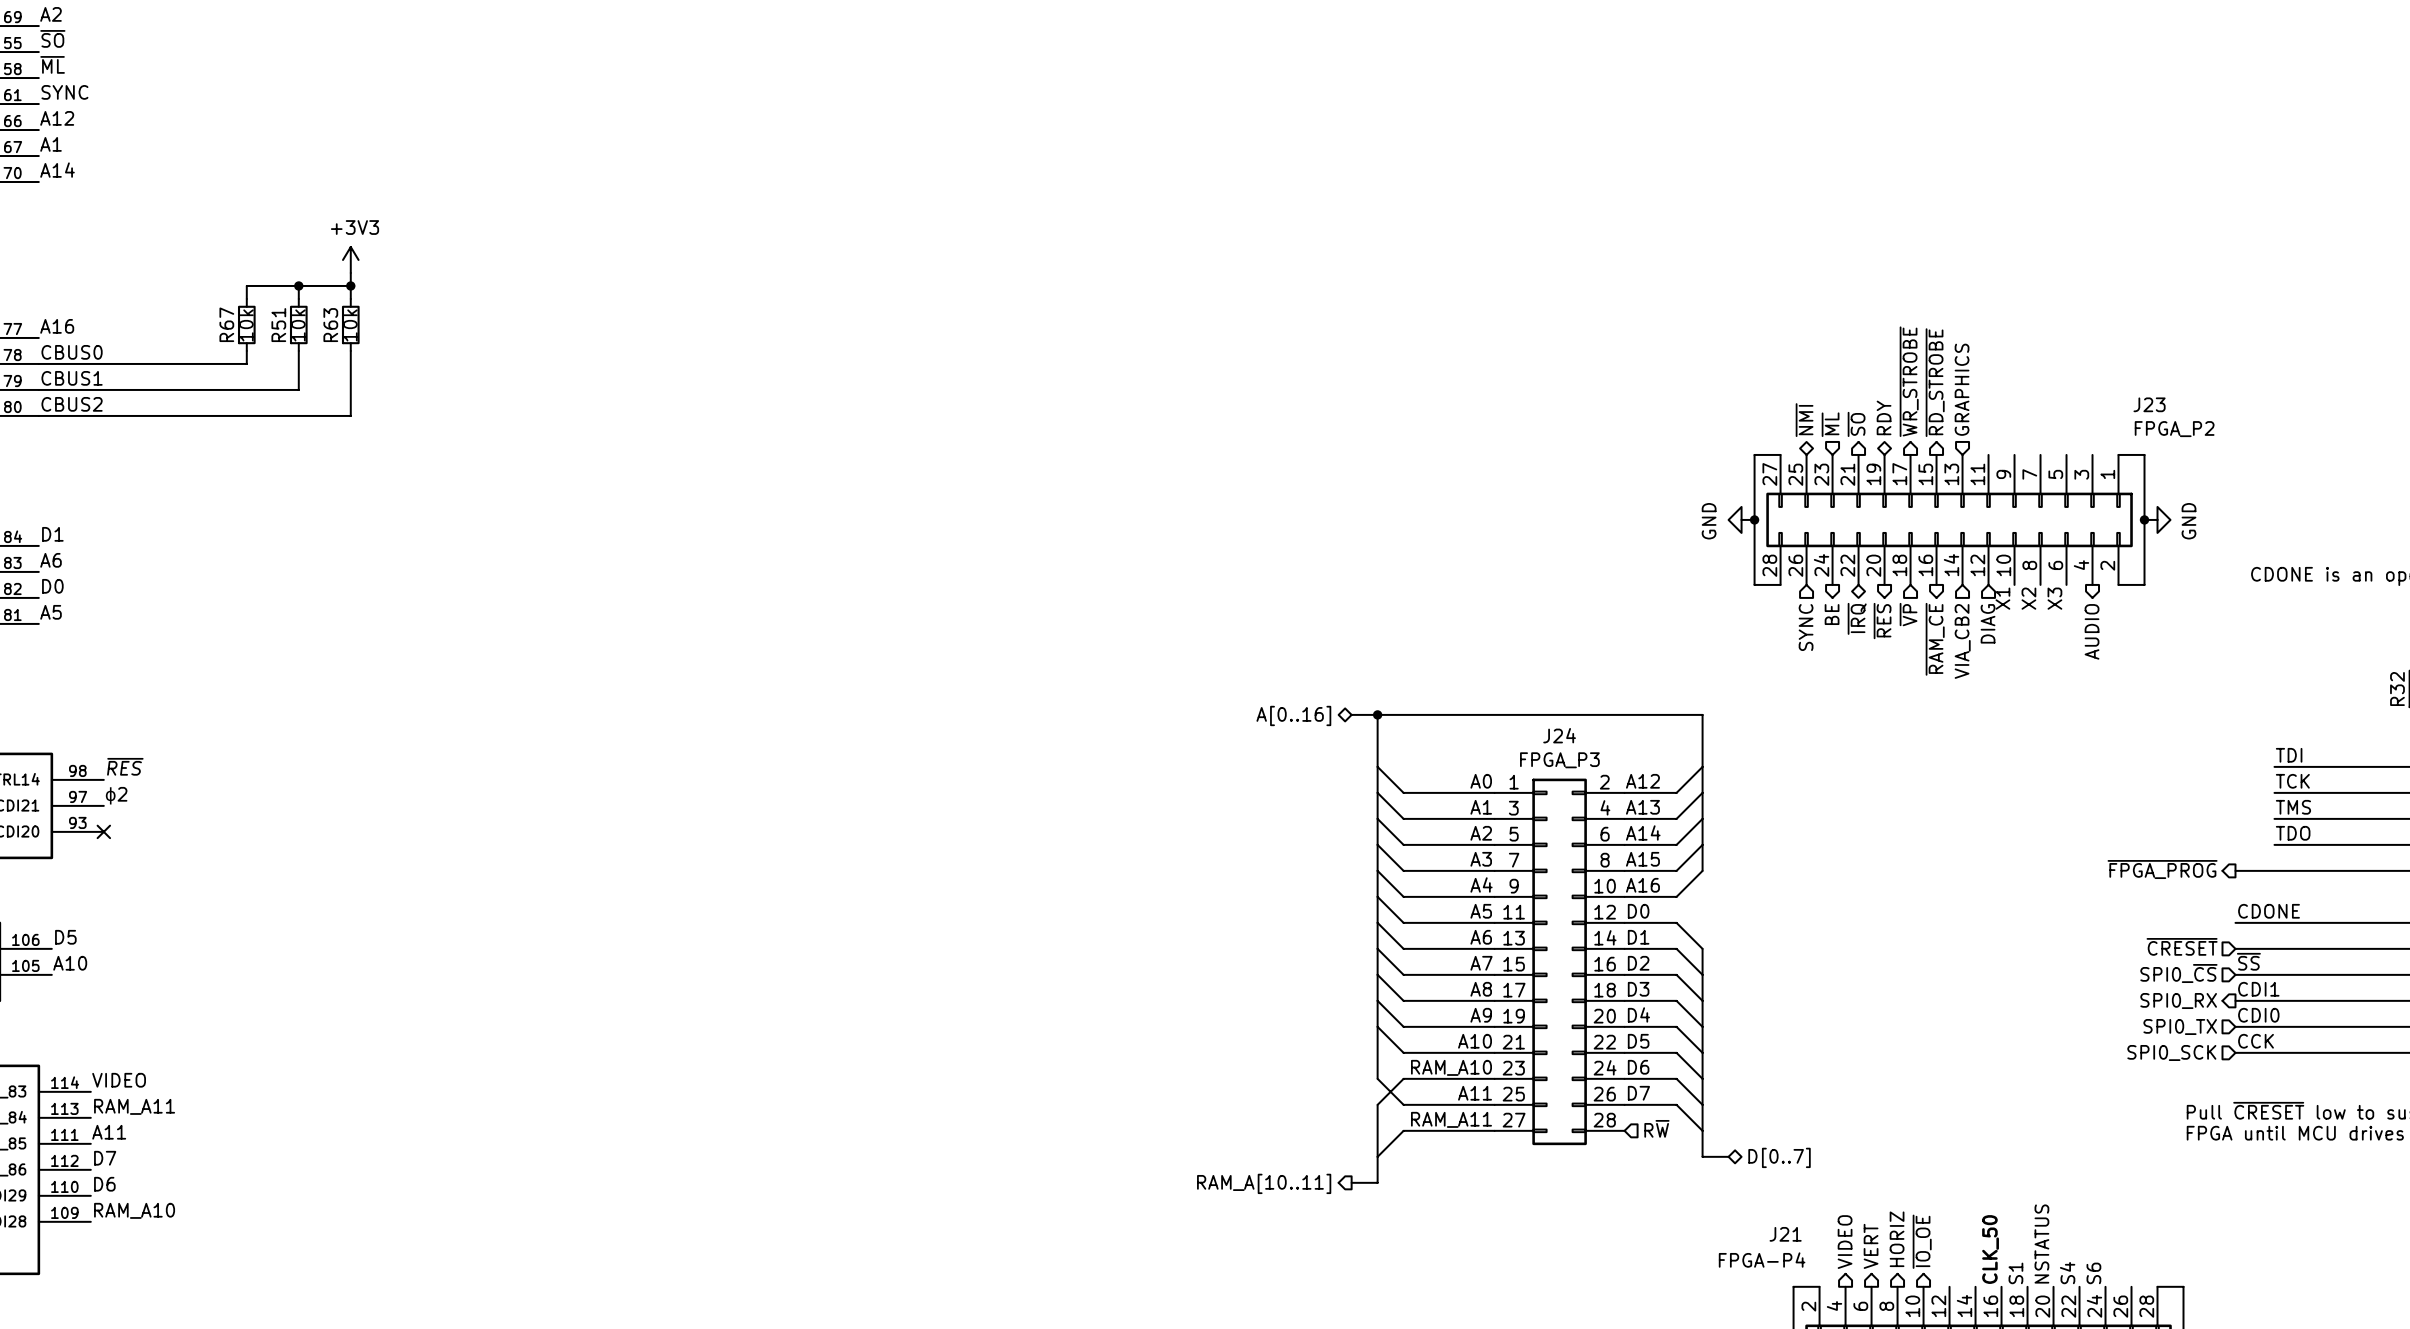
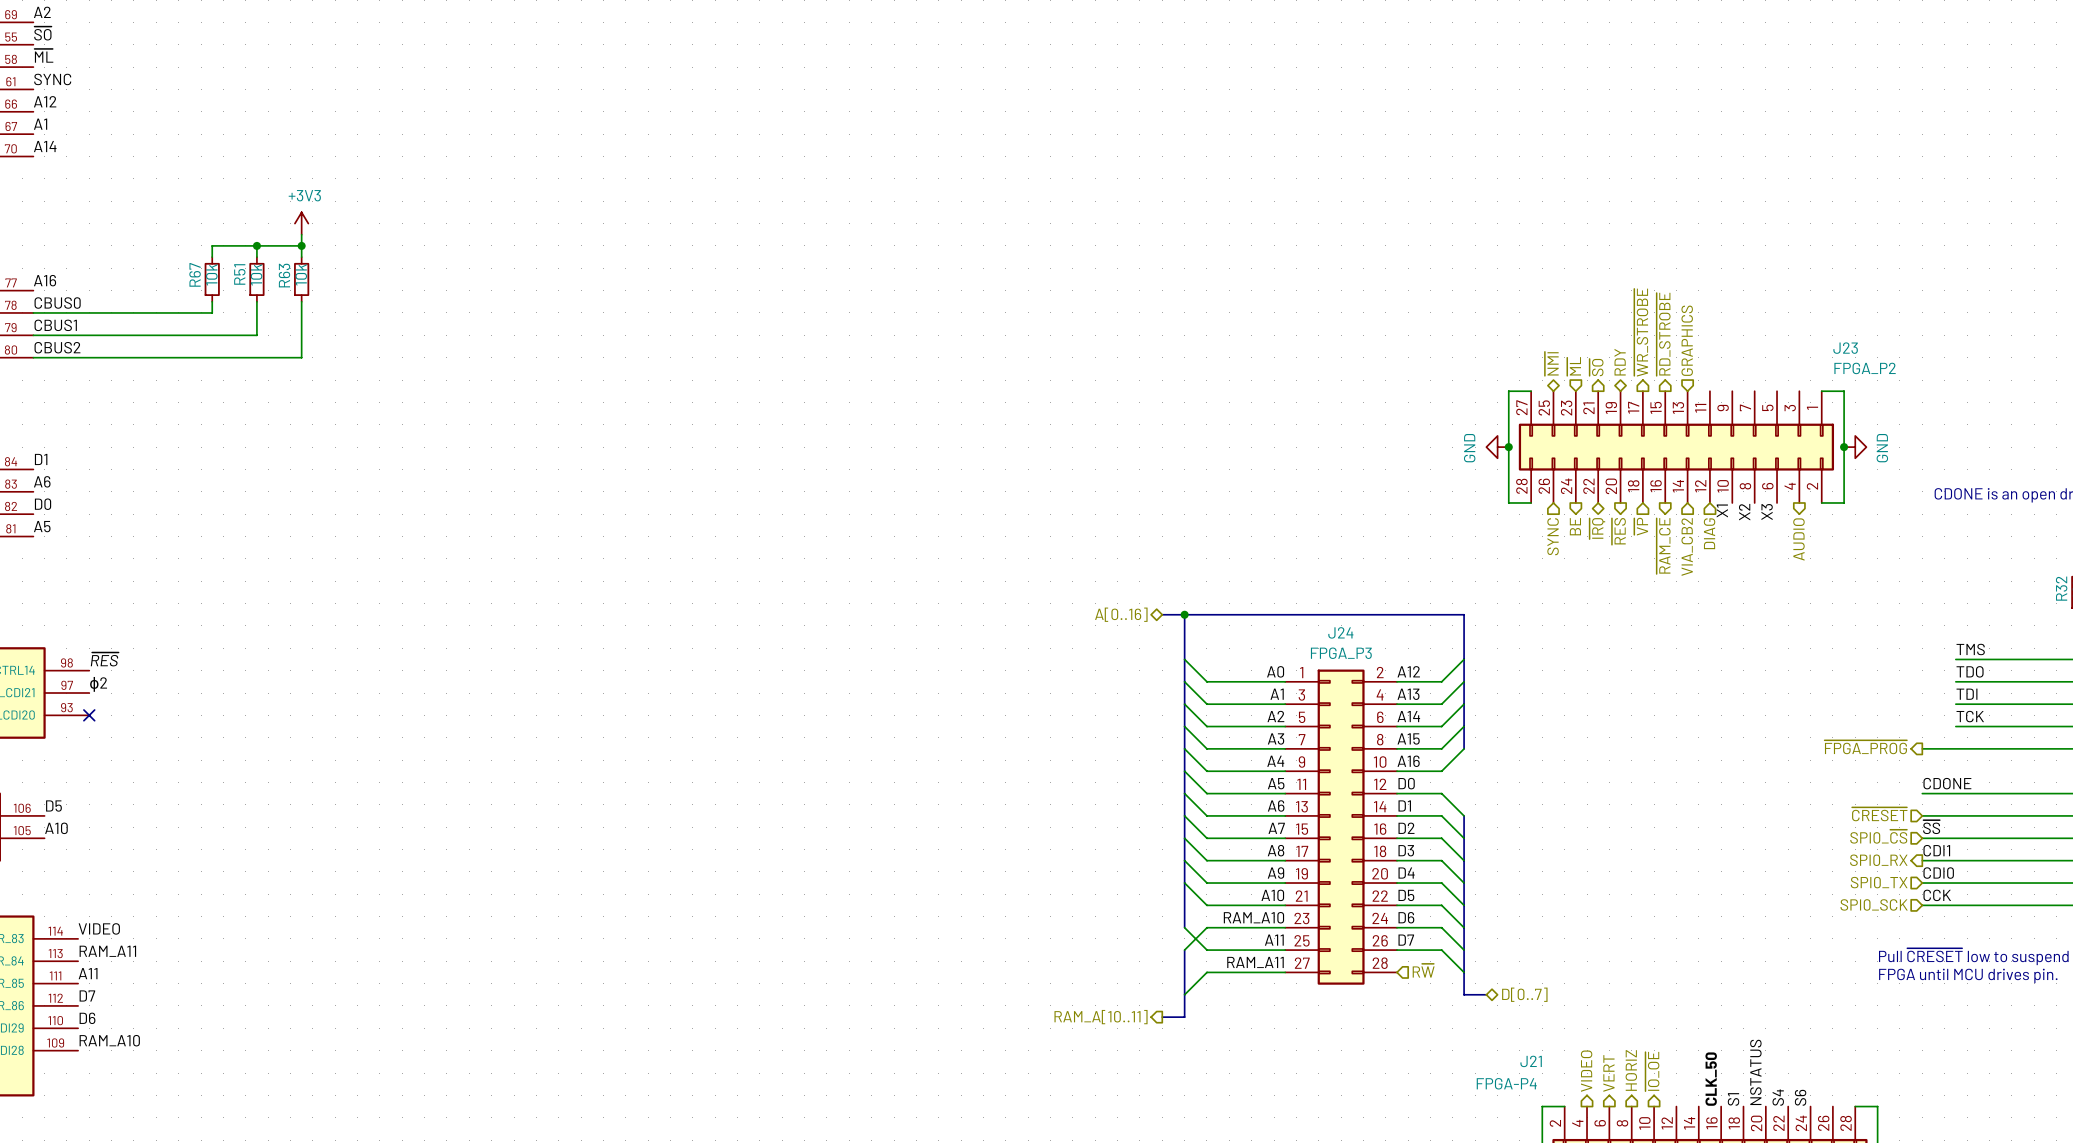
label: TDI (2289, 755) -> TMS (1970, 649)
label: TCK (2292, 781) -> TDO (1970, 671)
label: TMS (2293, 807) -> TDI (1966, 694)
label: TDO (2293, 833) -> TCK (1970, 716)

